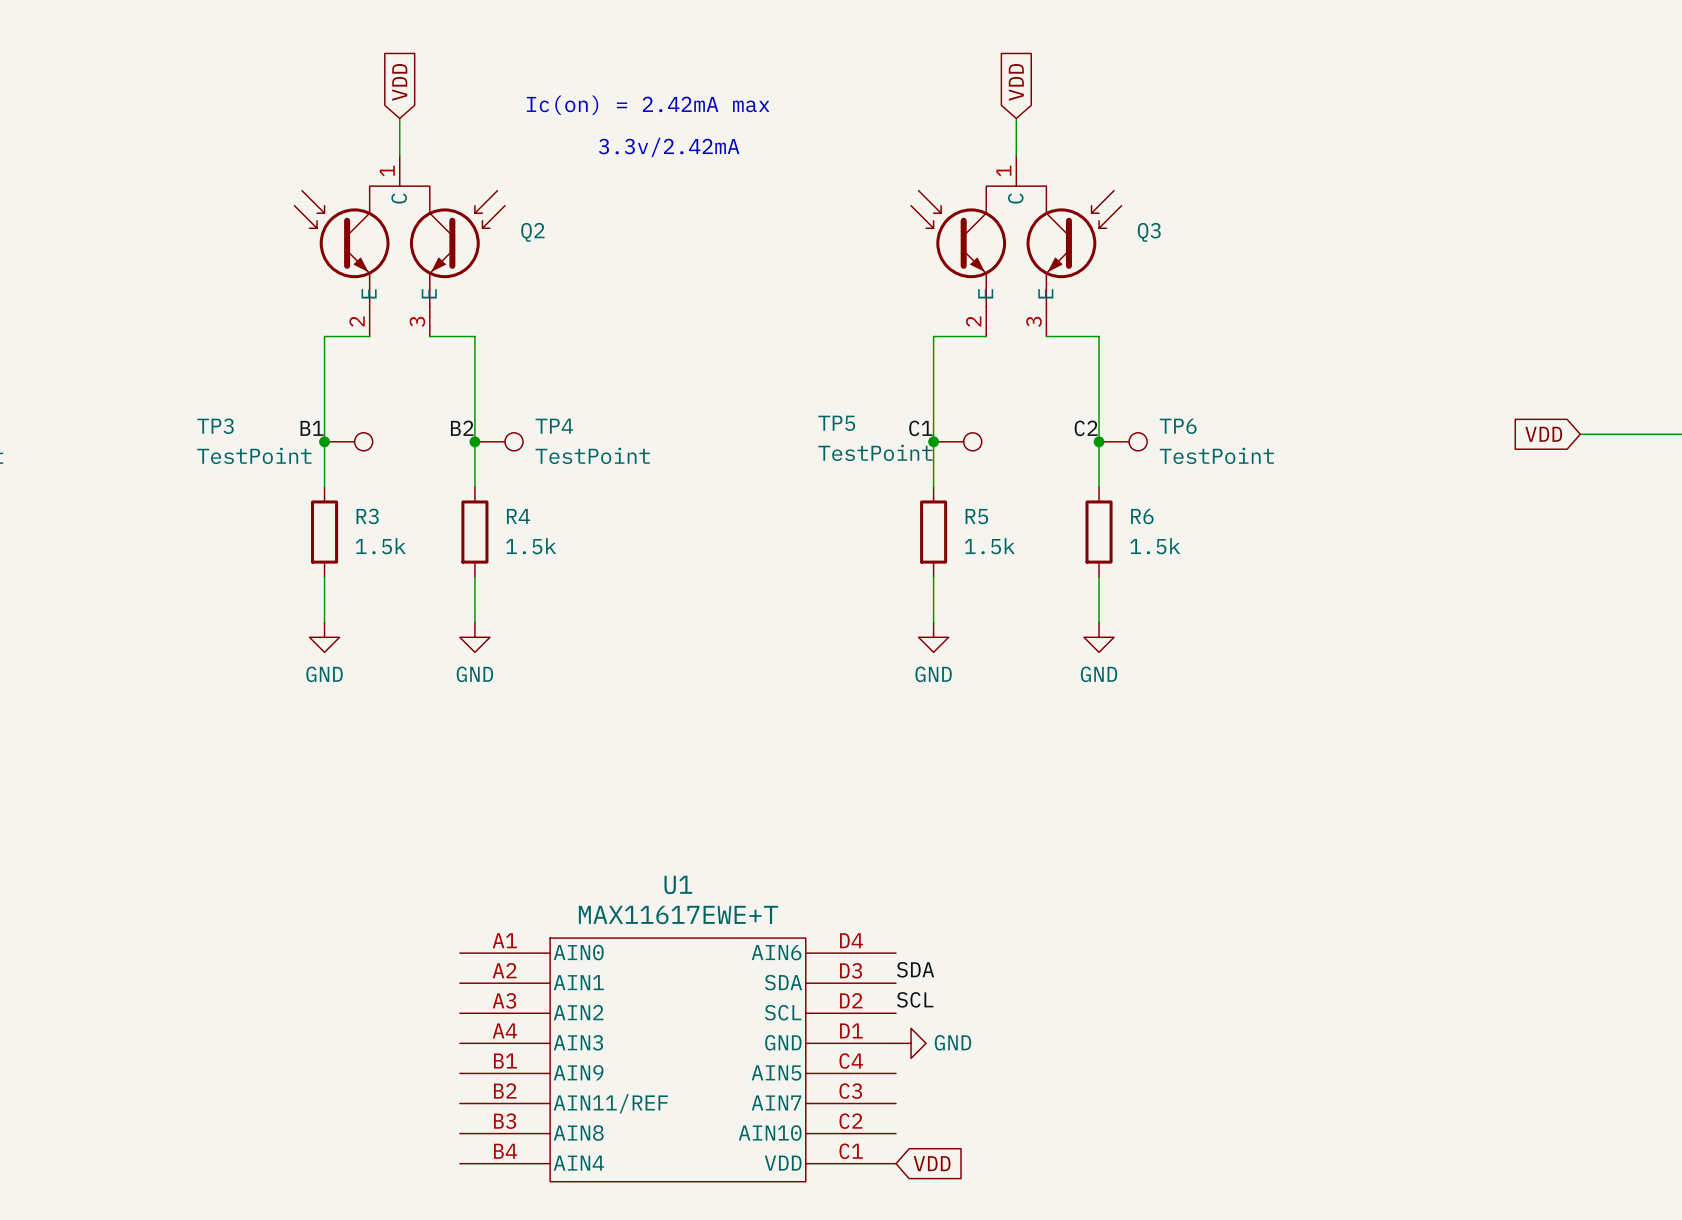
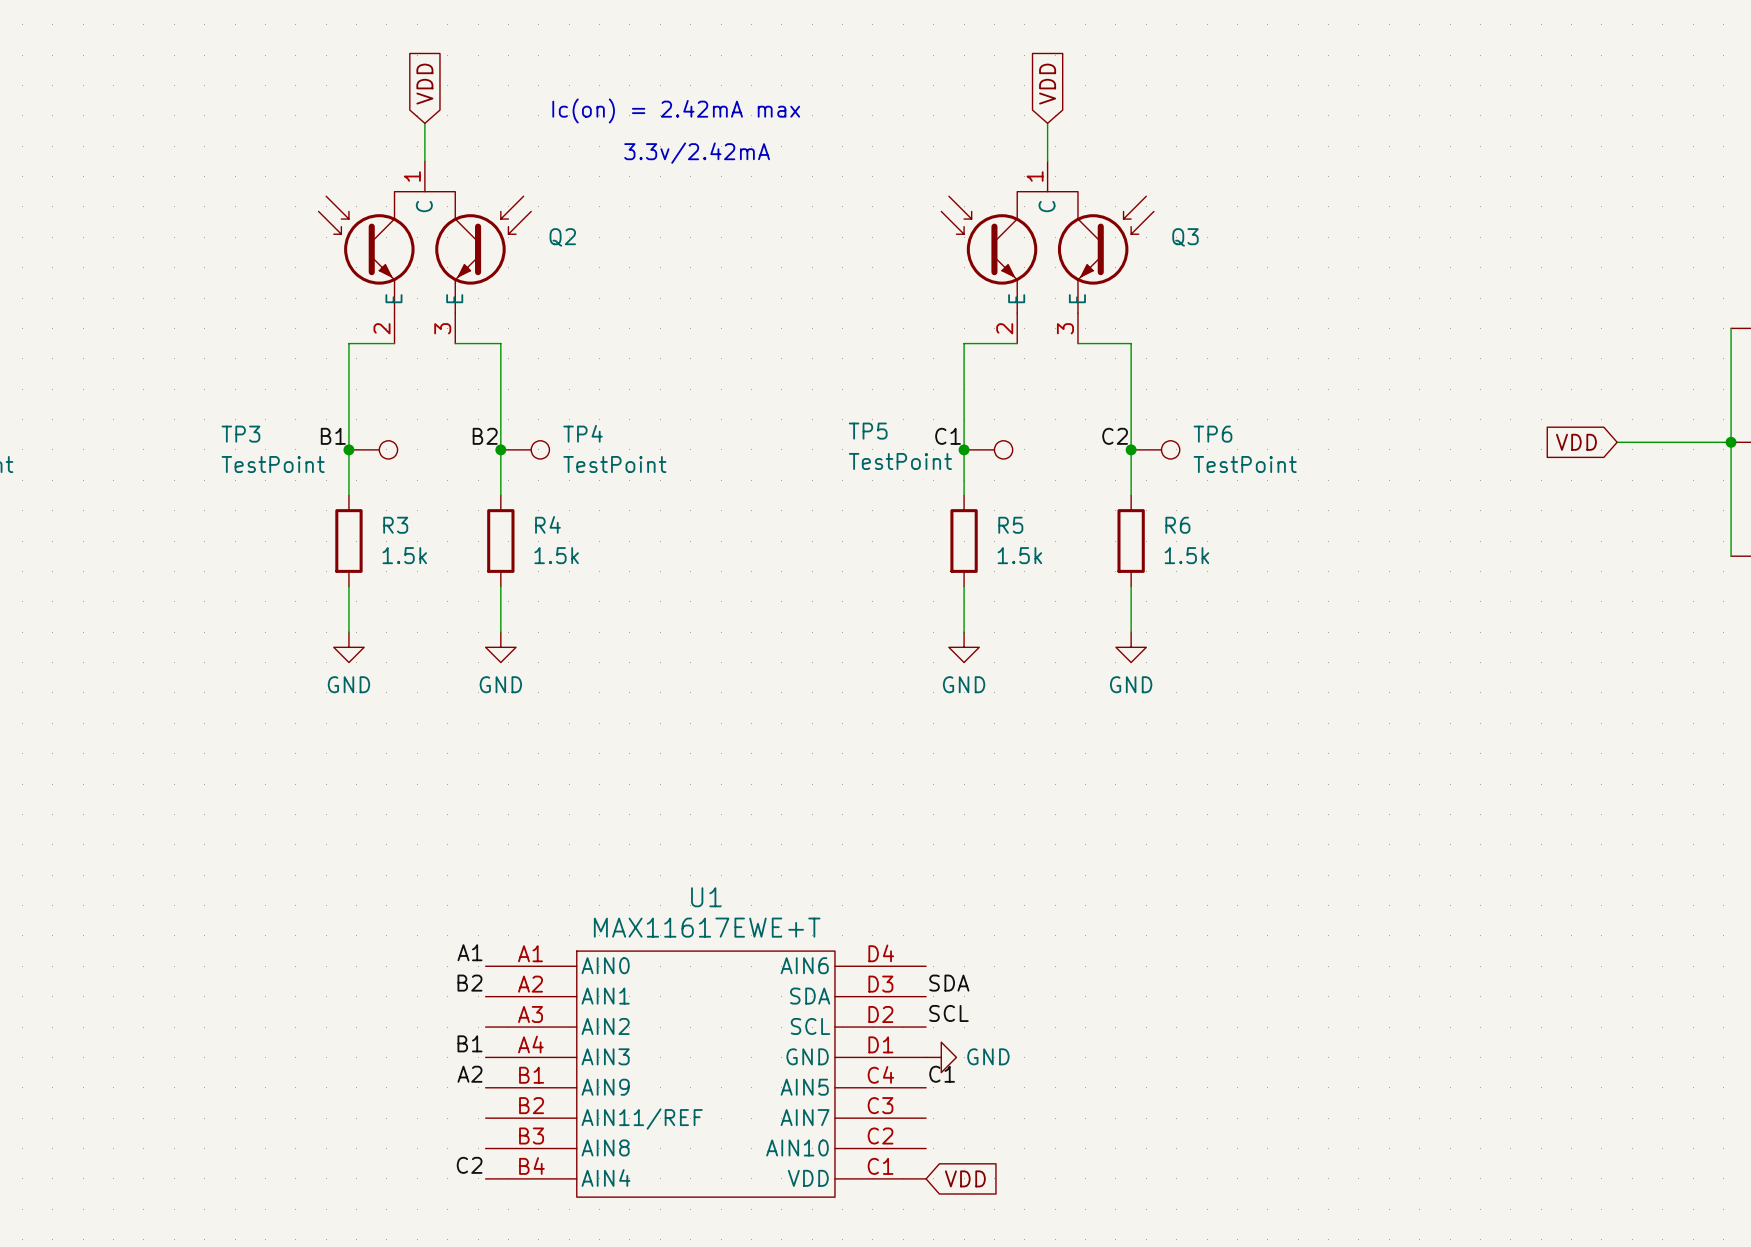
label: none -> A1 (469, 952)
label: none -> B2 (469, 983)
label: none -> B1 (469, 1043)
label: none -> A2 (469, 1074)
label: none -> C1 (942, 1074)
label: none -> C2 (469, 1165)

